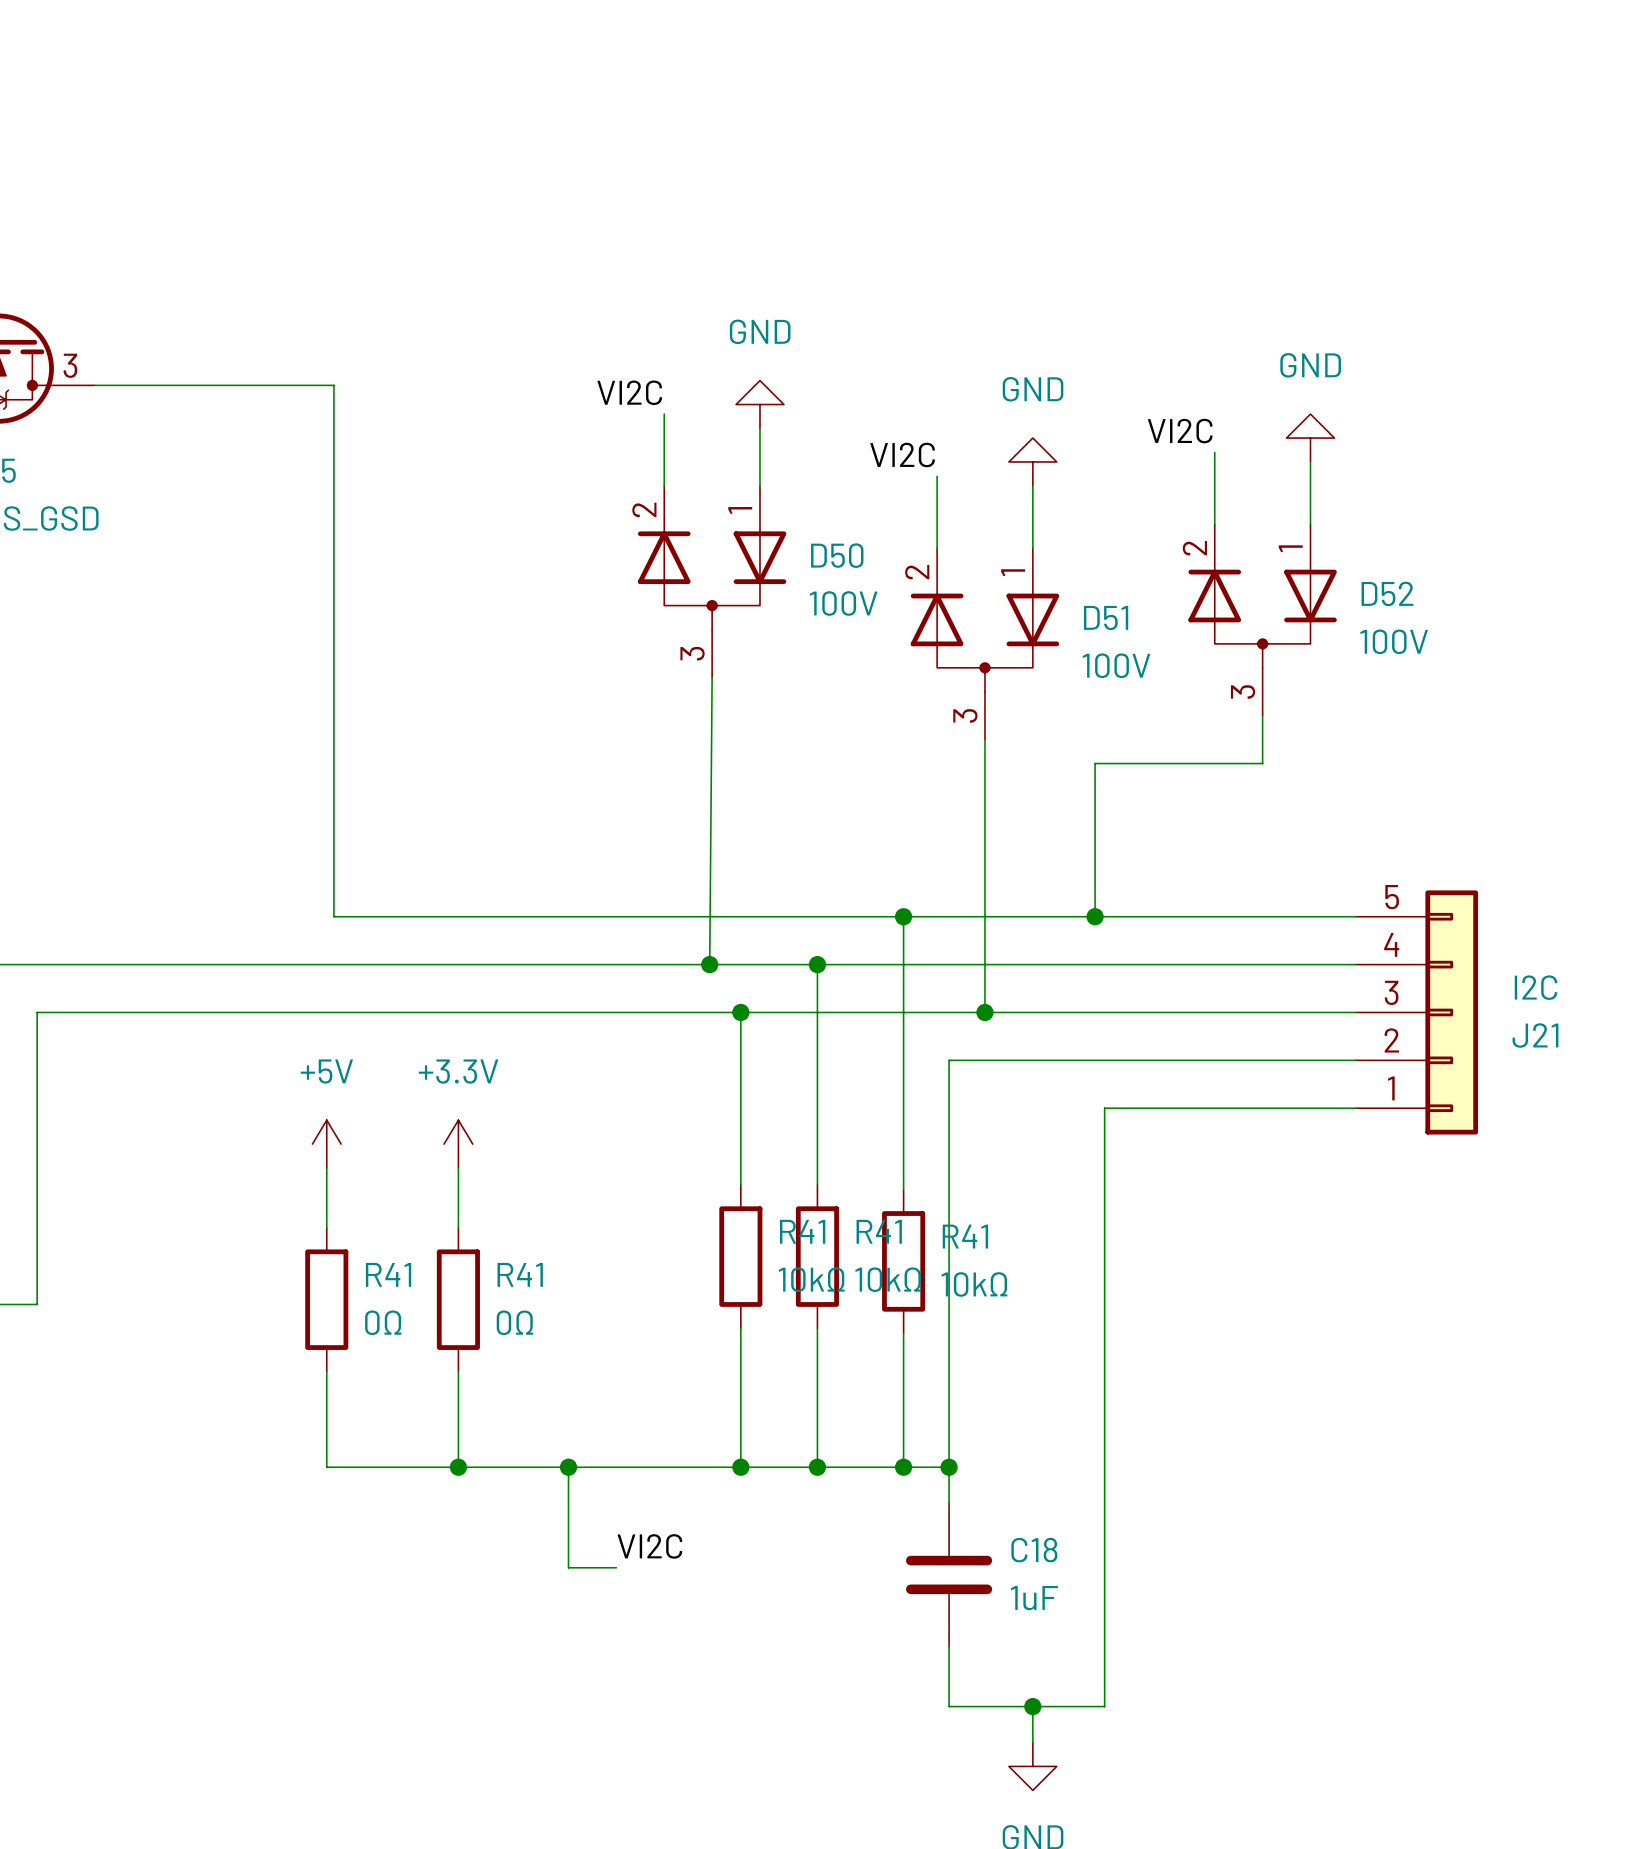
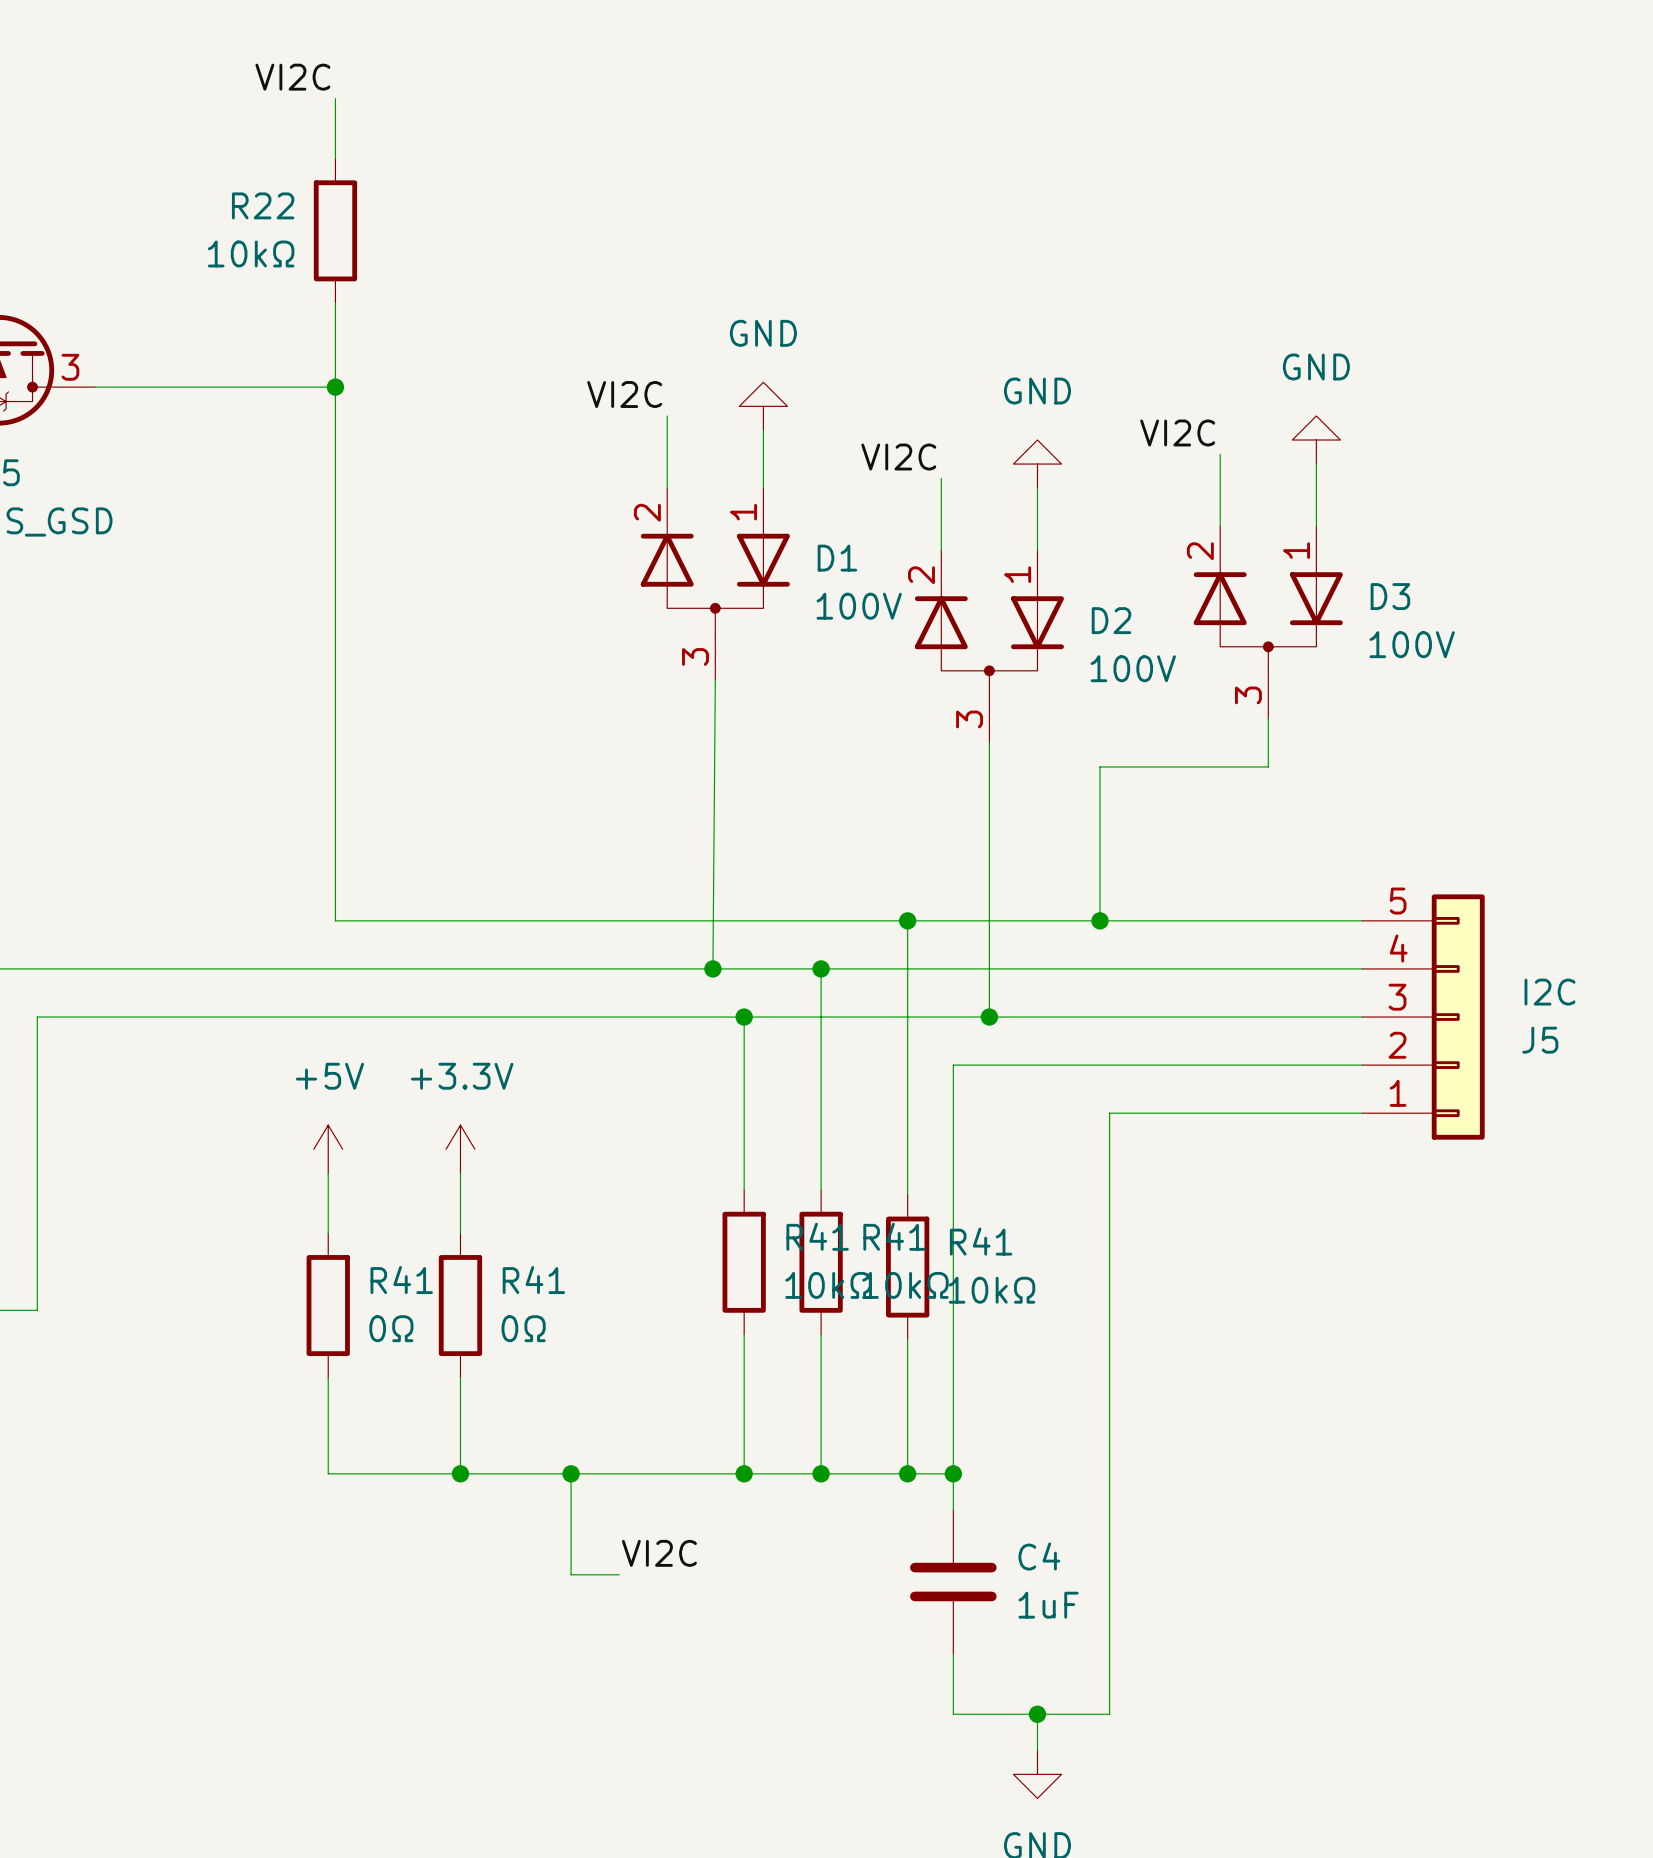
label: none -> VI2C (292, 77)
wire: none -> (335, 98) (335, 158)
R22: none -> 10kΩ (335, 230)
wire: none -> (335, 302) (335, 387)
junction: none -> (335, 387)
D50 name: D50 (837, 555) -> D1 (837, 558)
D52 name: D52 (1387, 593) -> D3 (1390, 596)
D51 name: D51 (1106, 617) -> D2 (1111, 620)
J21 name: J21 (1535, 1035) -> J5 (1540, 1040)
C18 name: C18 (1034, 1550) -> C4 (1039, 1556)

